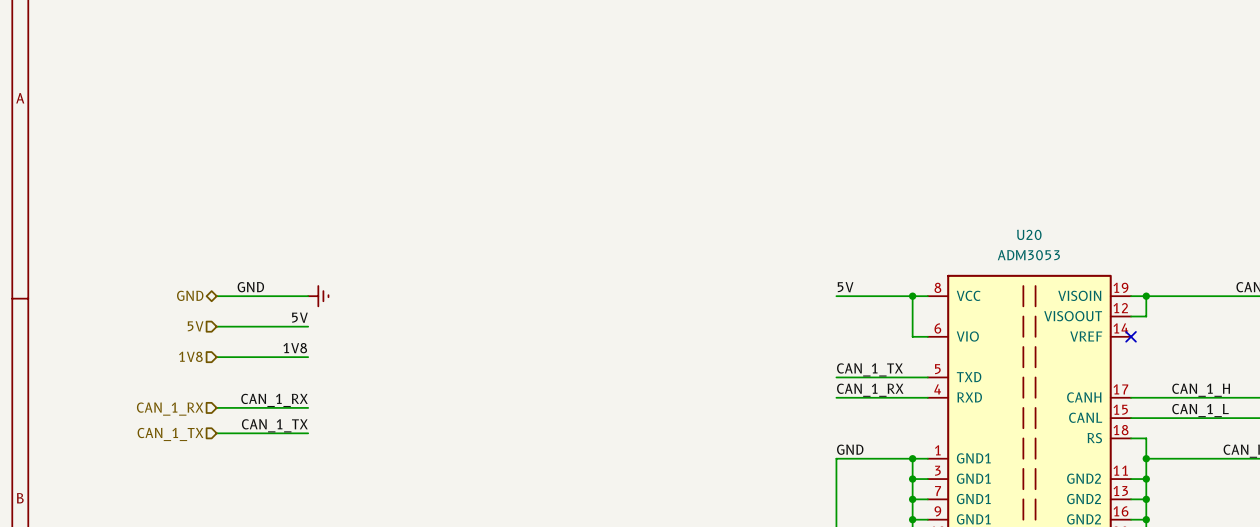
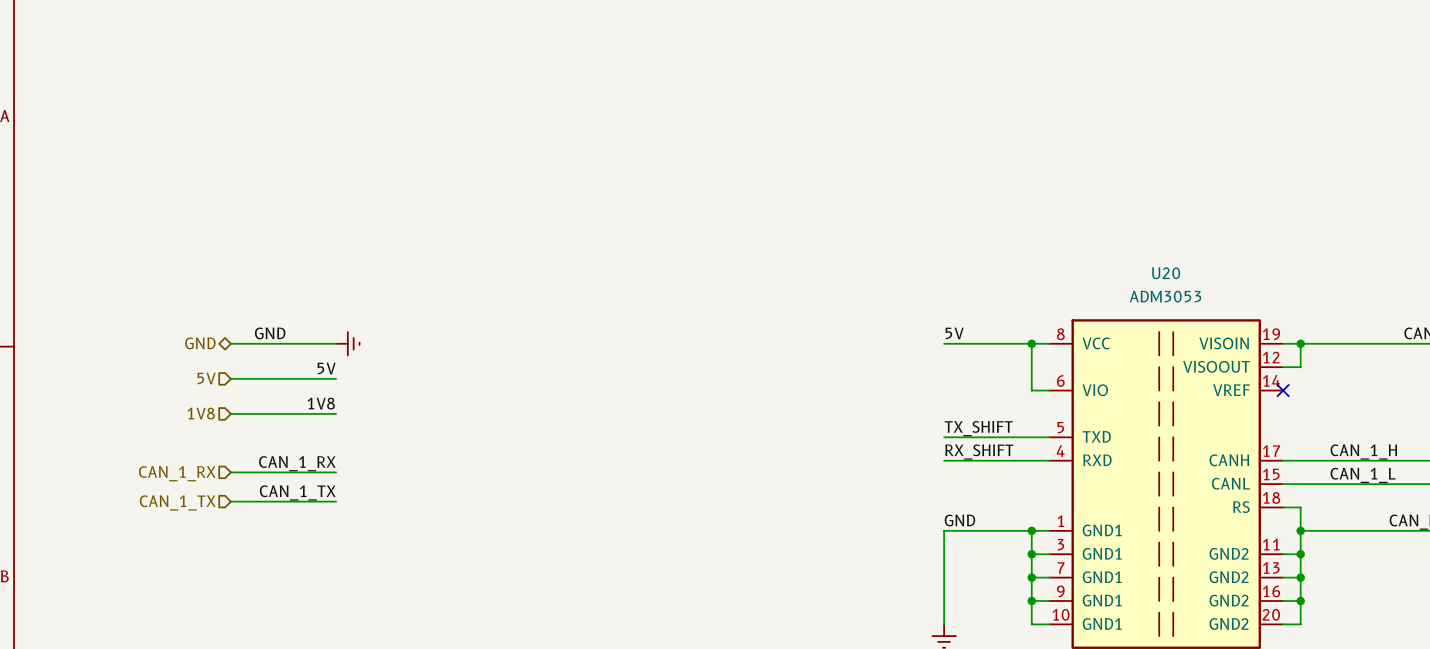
label: CAN_1_TX (869, 369) -> TX_SHIFT (978, 428)
label: CAN_1_RX (870, 390) -> RX_SHIFT (979, 452)

